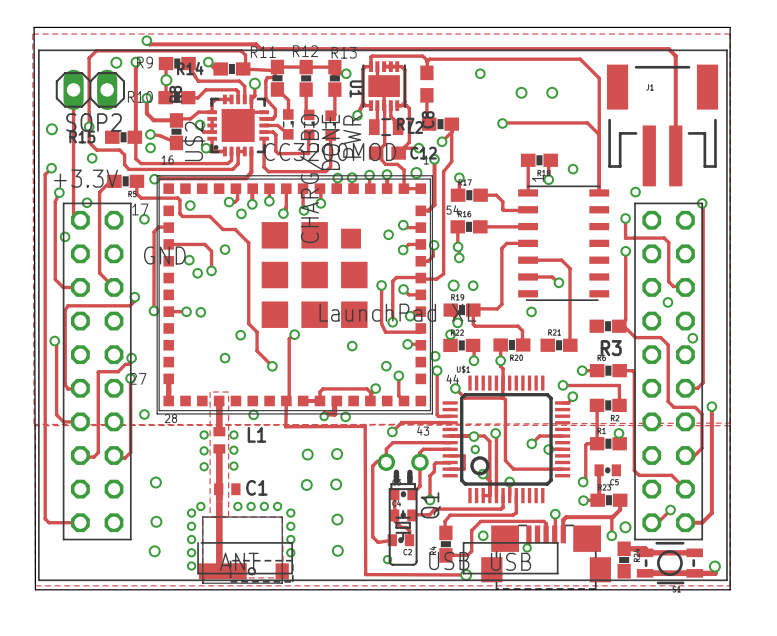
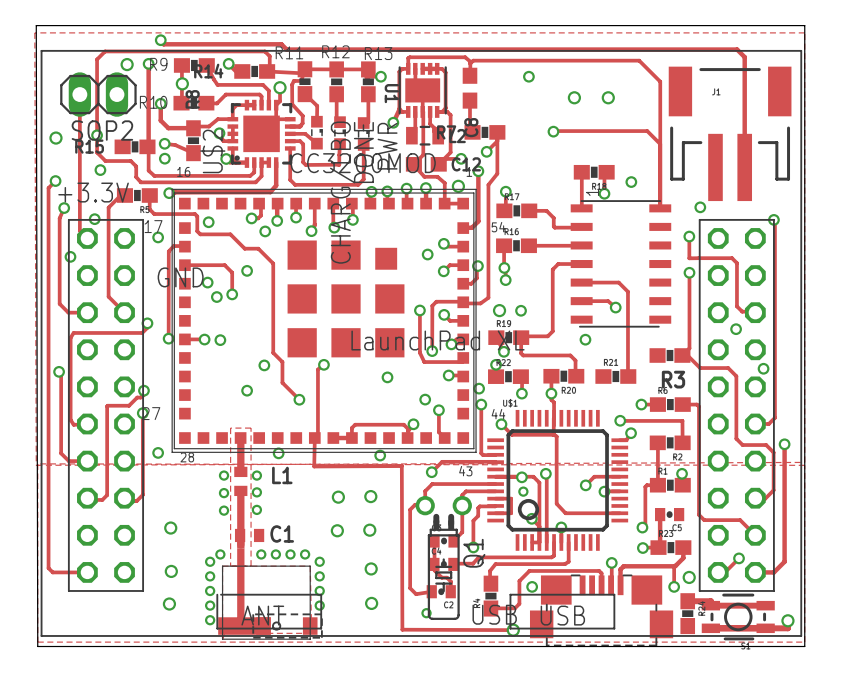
track: (168, 378) (168, 400) -> none
track: (336, 400) (334, 400) (334, 413) (324, 413) (324, 416) -> none
via: (324, 416) -> none
via: (527, 548) -> none

